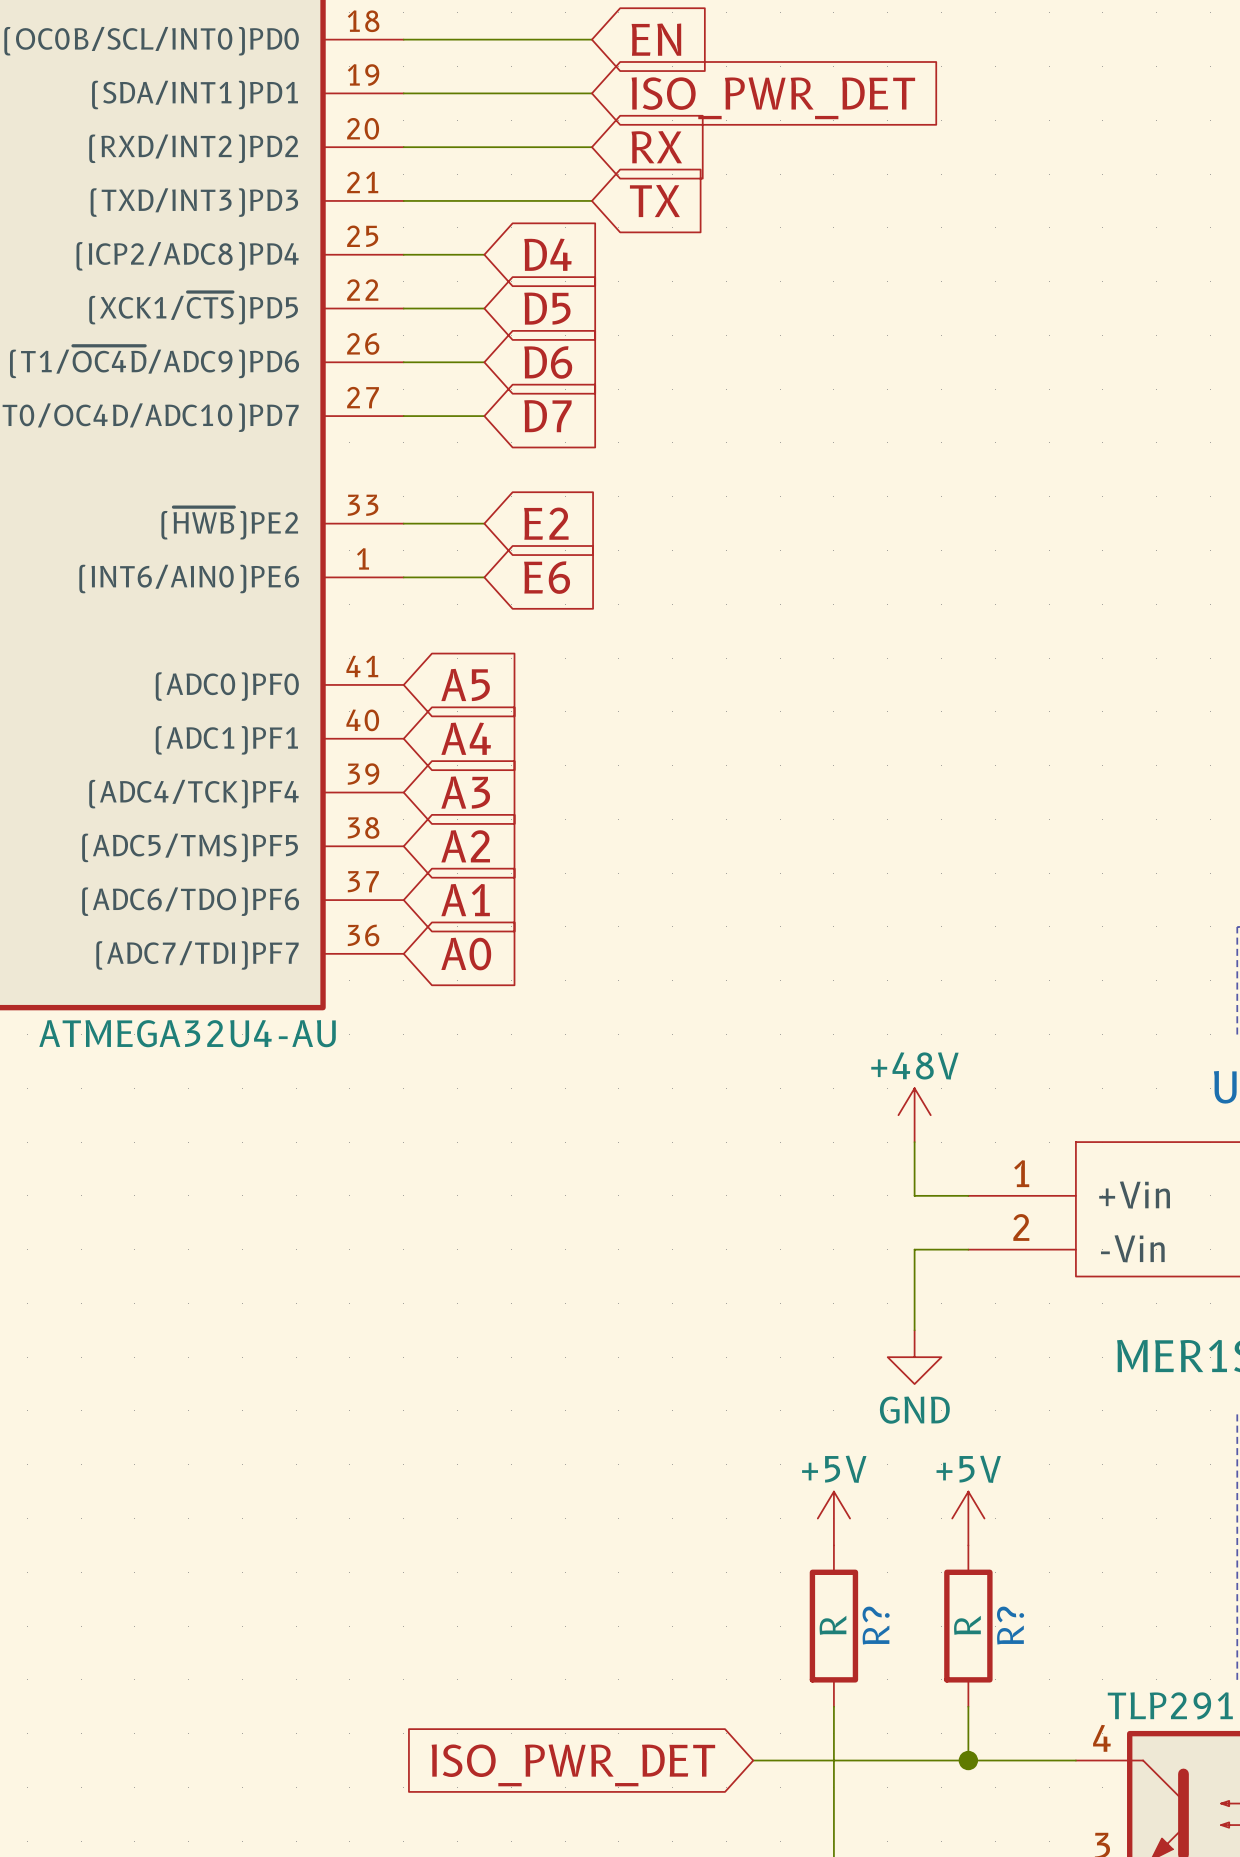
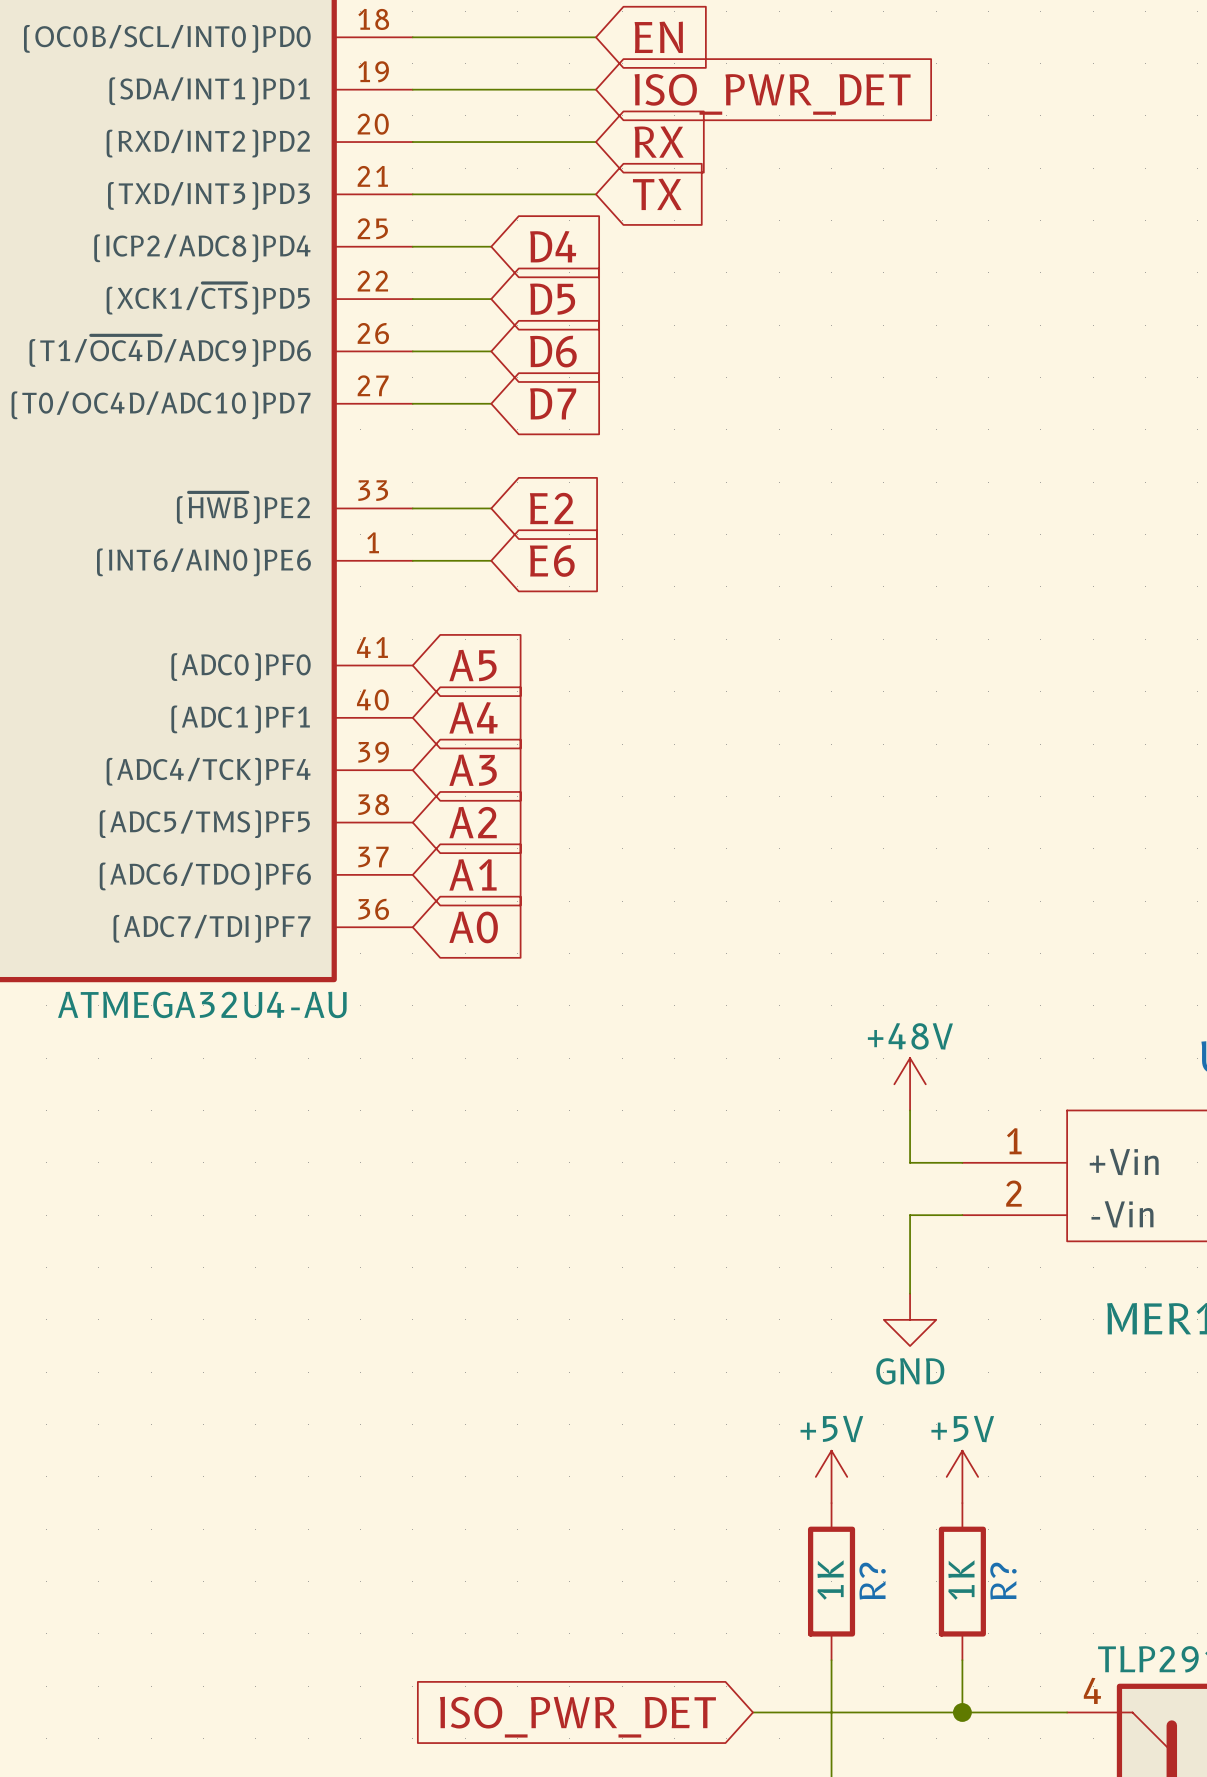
R? value: R (832, 1625) -> 1K (830, 1580)
R? value: R (967, 1625) -> 1K (961, 1580)

